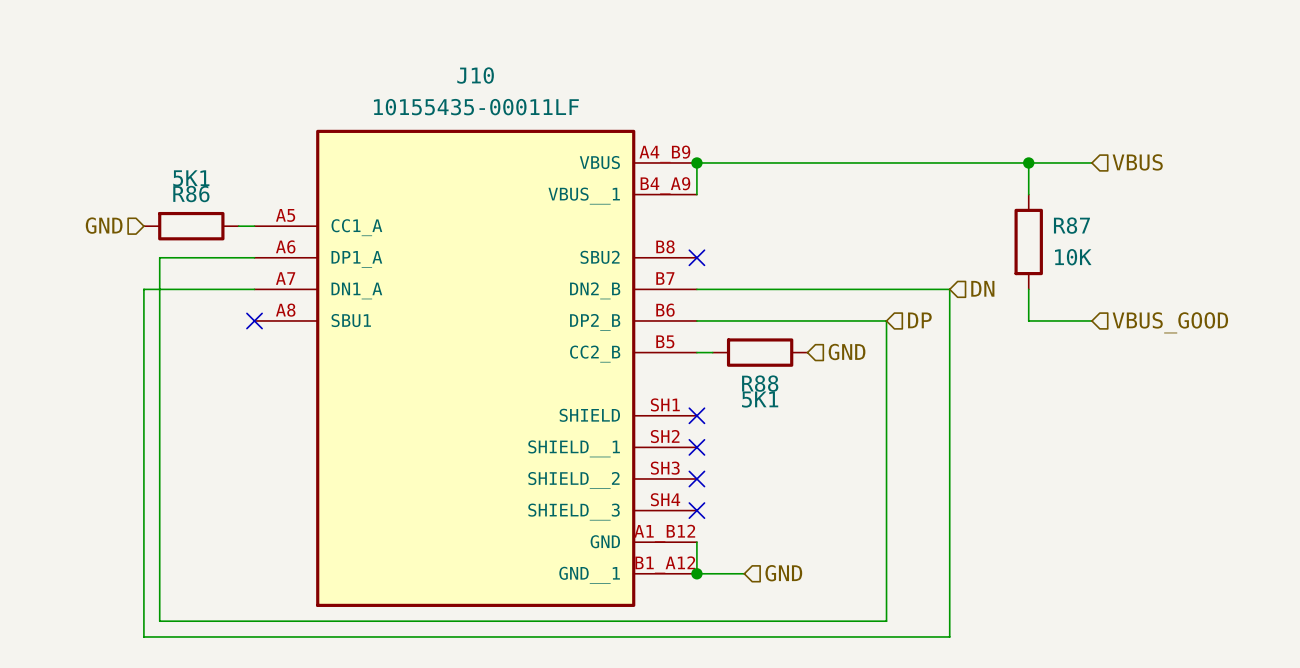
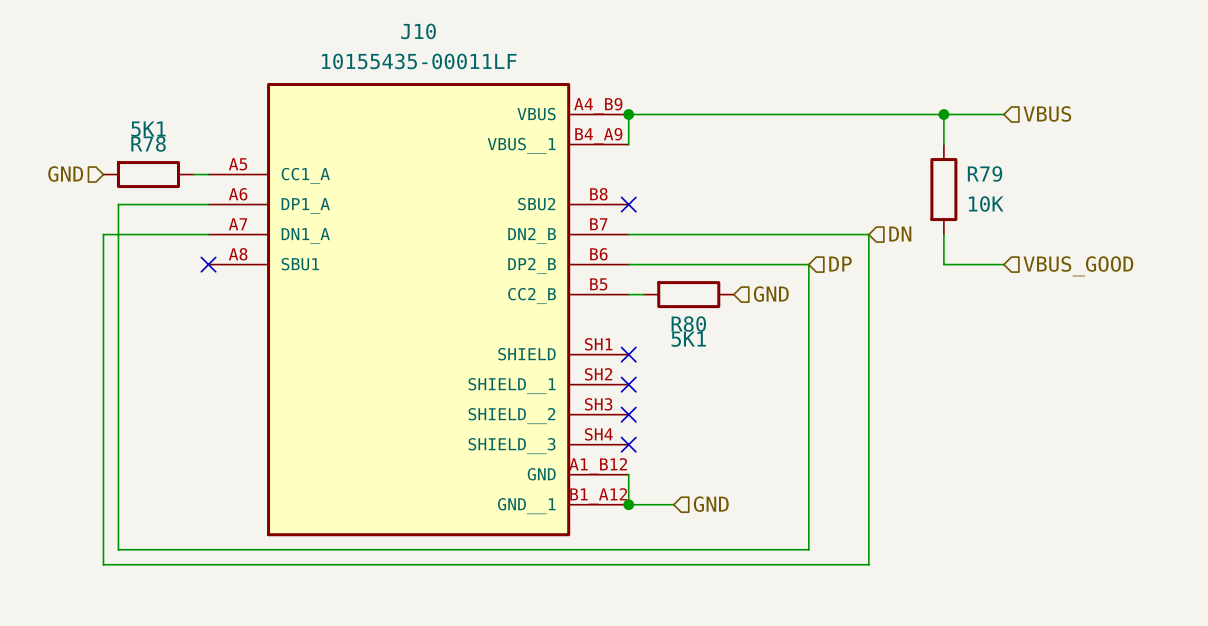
R86 name: R86 (191, 194) -> R78 (148, 143)
R87 name: R87 (1071, 225) -> R79 (985, 173)
R88 name: R88 (760, 383) -> R80 (688, 324)

